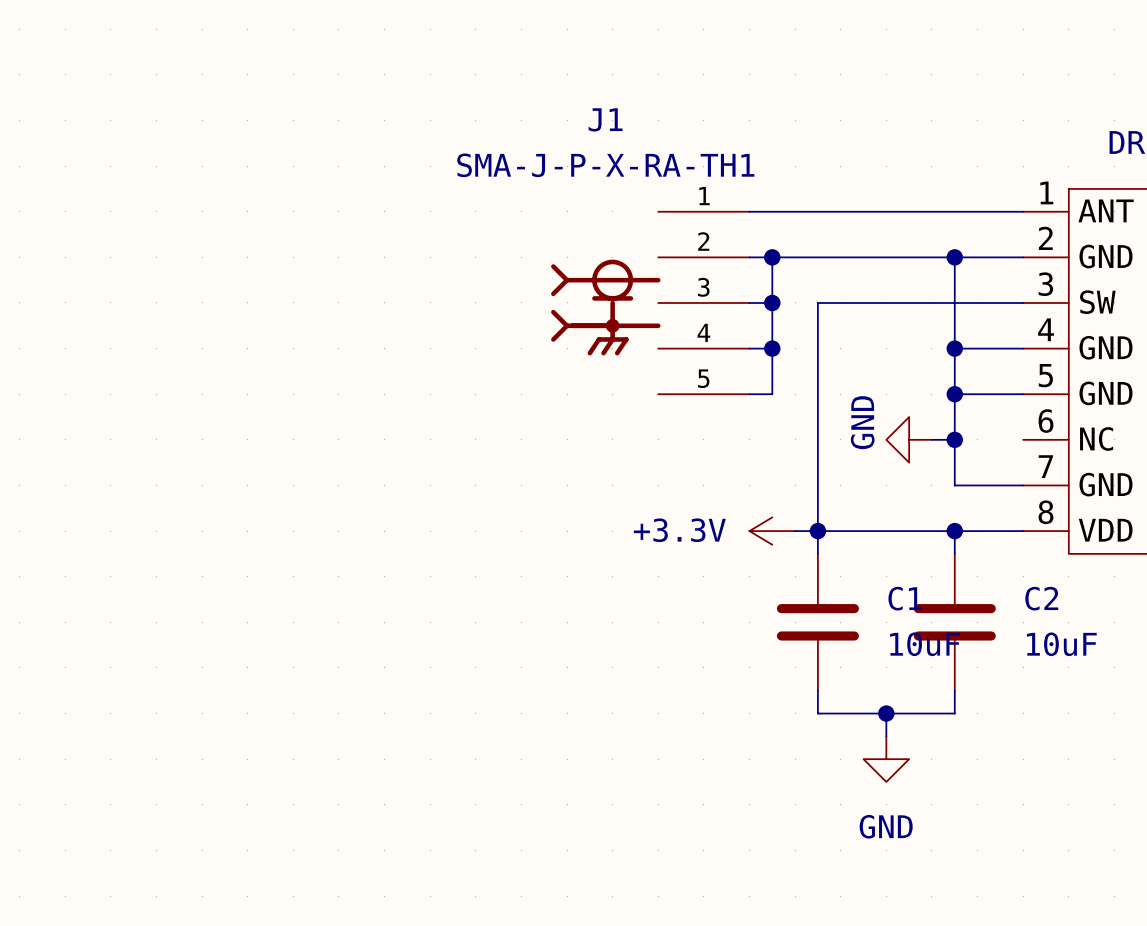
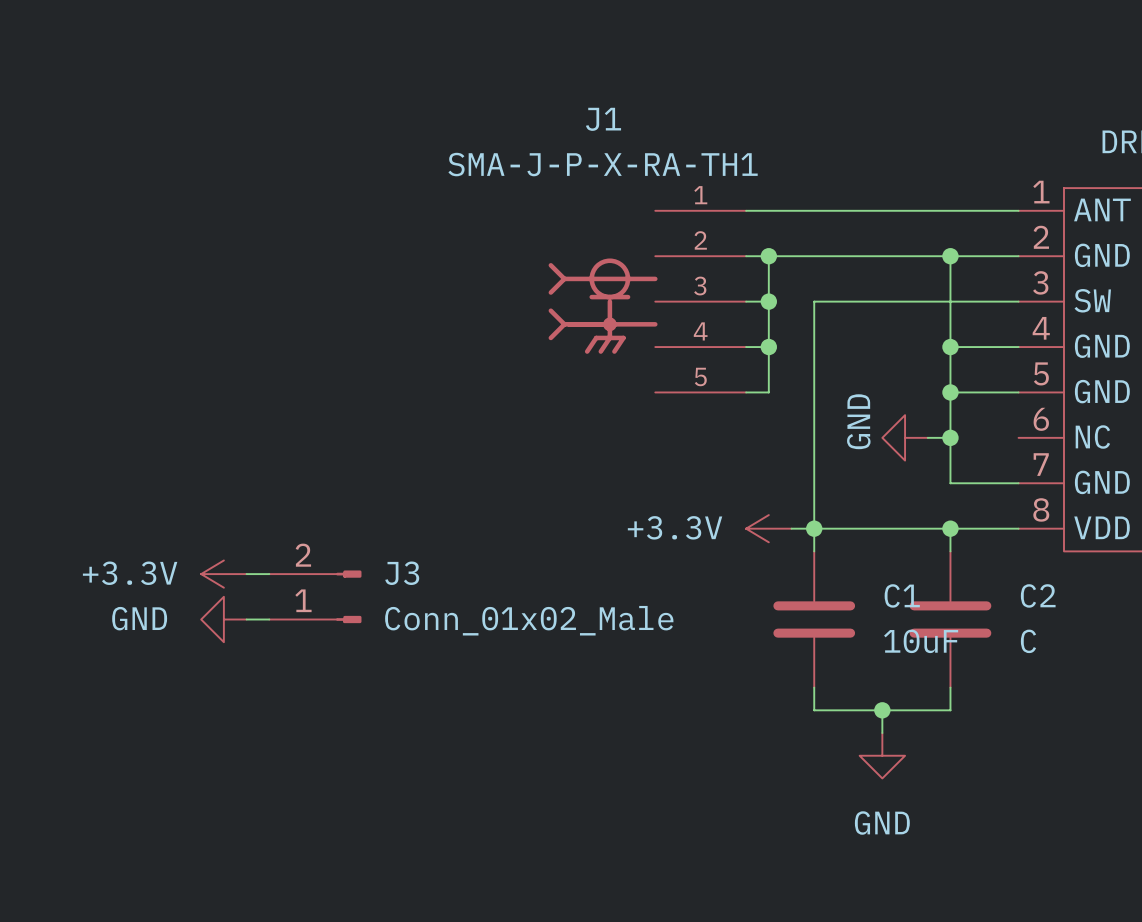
power symbol: none -> +3.3V (223, 574)
wire: none -> (246, 574) (269, 574)
J3: none -> Conn_01x02_Male (315, 596)
power symbol: none -> GND (223, 619)
wire: none -> (246, 619) (269, 619)
C2 value: 10uF (1061, 644) -> C (1028, 641)

